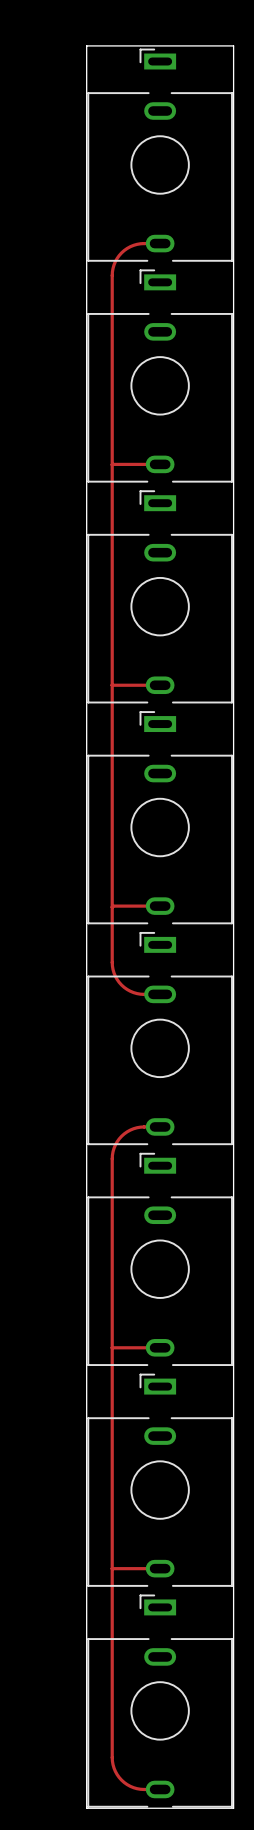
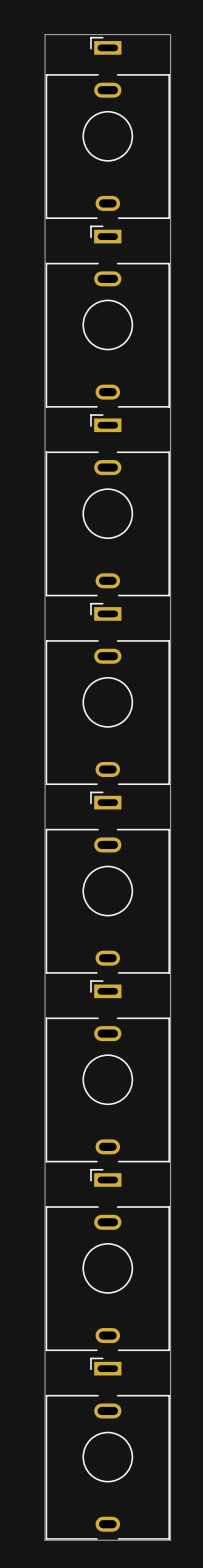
track: (160, 243) (140, 243) (127, 248) (117, 258) (112, 275) (112, 966) (117, 979) (127, 989) (140, 994) (160, 994) -> none
track: (160, 464) (112, 464) -> none
track: (112, 685) (160, 685) -> none
track: (160, 906) (112, 907) -> none
track: (160, 1126) (140, 1127) (127, 1131) (115, 1145) (112, 1158) (112, 1761) (117, 1774) (127, 1784) (140, 1789) (160, 1789) -> none
track: (112, 1347) (160, 1347) -> none
track: (112, 1568) (160, 1568) -> none

